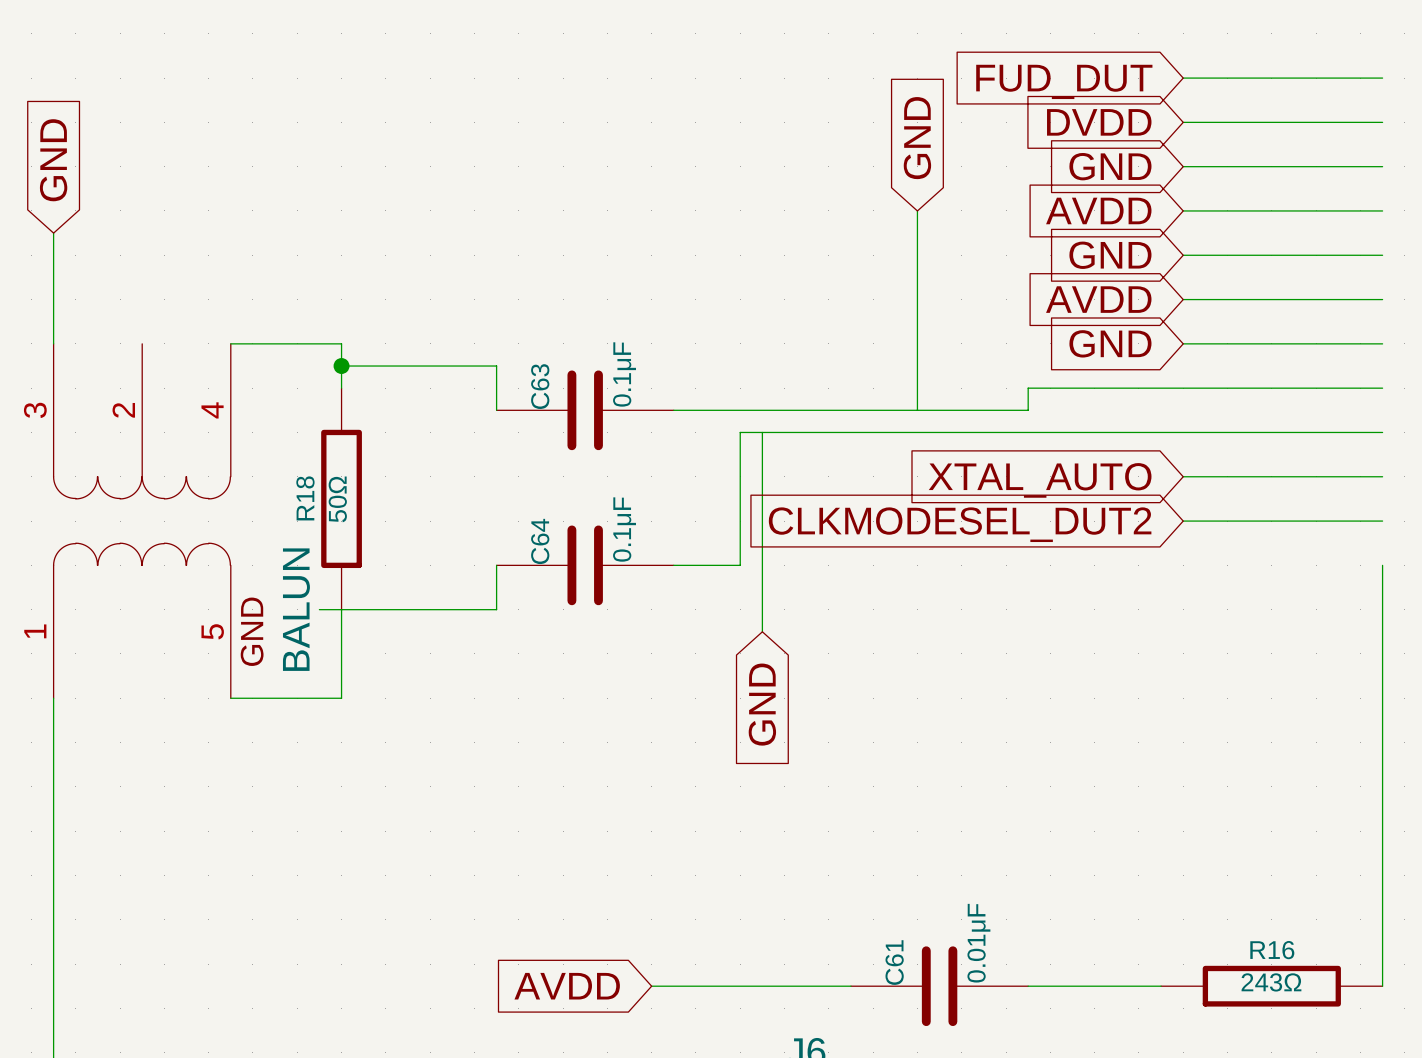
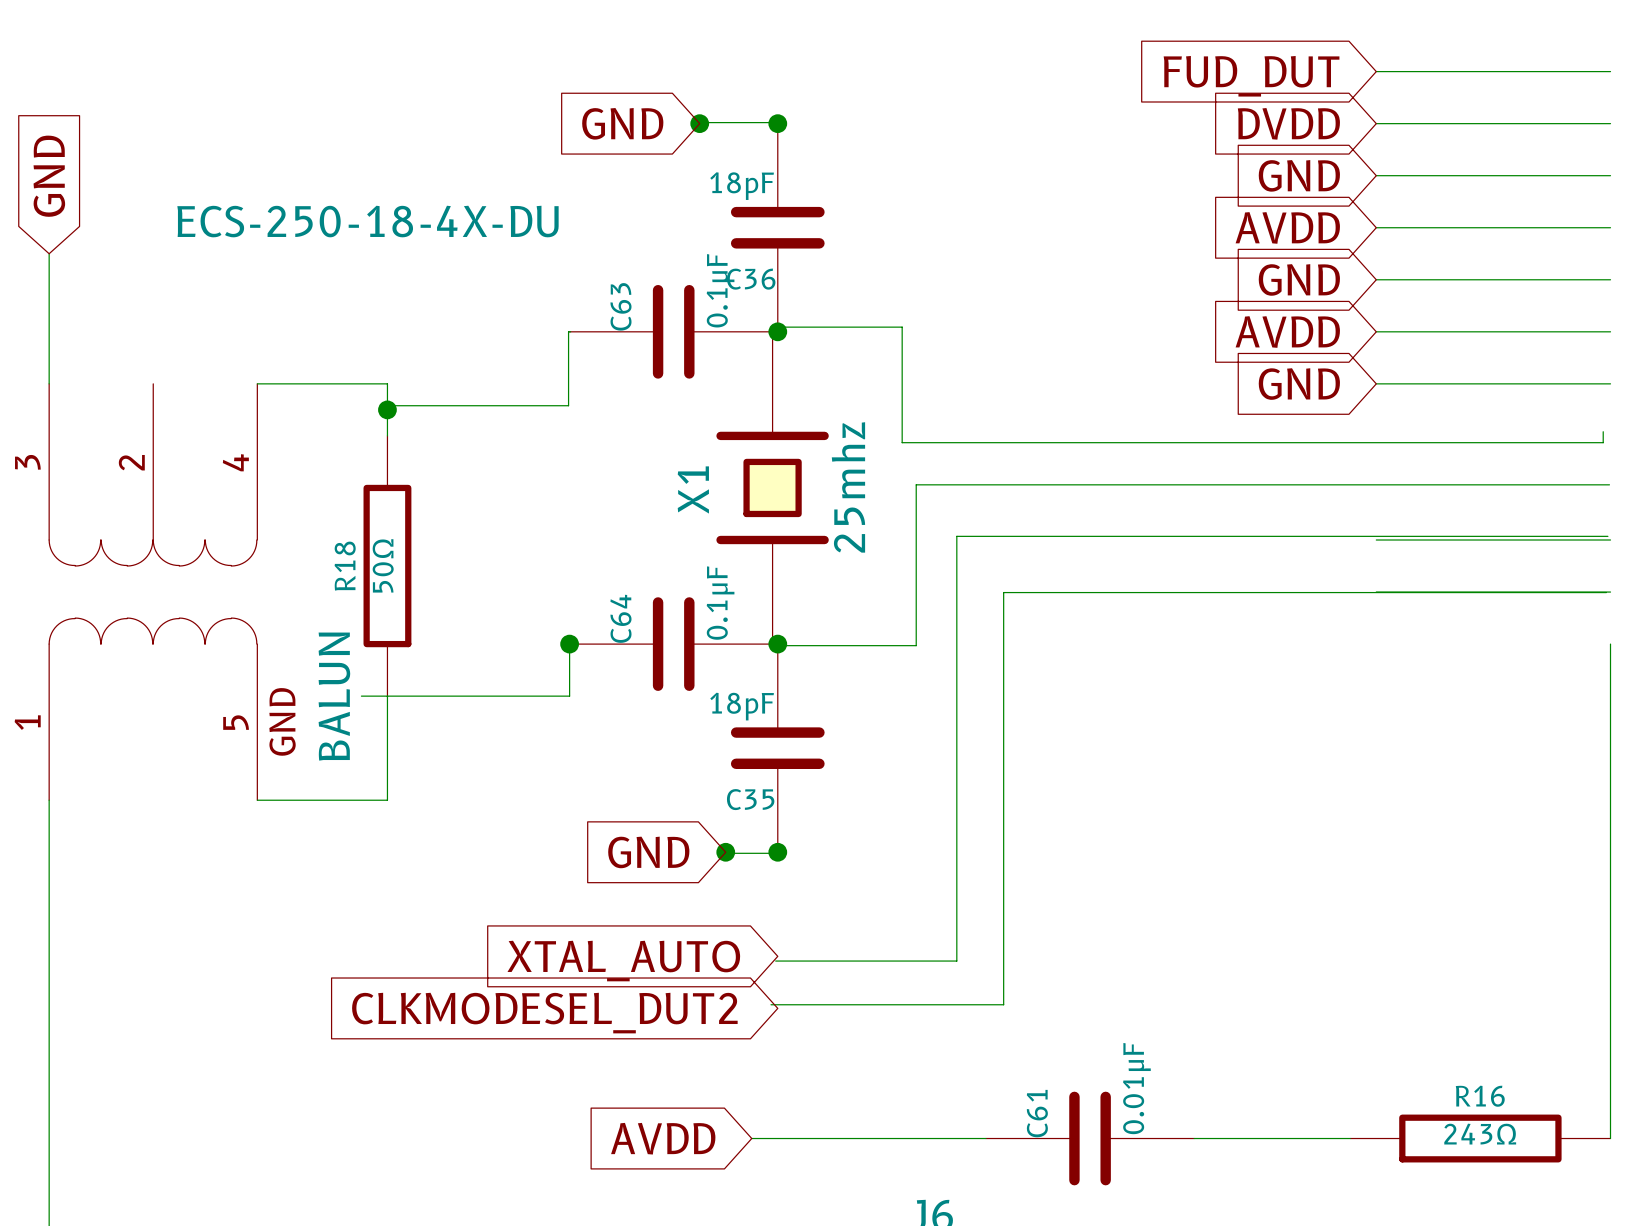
wire: none -> (772, 121) (772, 122) (694, 122)
global label: none -> GND (622, 123)
junction: none -> (699, 123)
junction: none -> (777, 123)
global label: GND (917, 138) -> none
C36: none -> 18pF (777, 227)
wire: (917, 210) (917, 410) -> none
wire: none -> (771, 327) (902, 327) (902, 442) (1603, 442) (1603, 431)
wire: none -> (570, 331) (568, 331) (568, 405) (380, 405)
junction: none -> (777, 331)
wire: (341, 366) (496, 366) (496, 410) -> none
wire: (1382, 388) (1028, 388) (1028, 410) (673, 410) -> none
C63 position: (585, 410) -> (673, 331)
wire: none -> (1609, 484) (916, 484) (916, 645) (775, 645)
X1: none -> 25mhz (772, 487)
wire: (762, 432) (762, 631) -> none
wire: (1382, 432) (740, 432) (740, 565) (673, 565) -> none
wire: none -> (1607, 536) (956, 536) (956, 961) (775, 961)
global label: XTAL_AUTO (1040, 480) -> none
wire: none -> (1606, 592) (1003, 592) (1003, 1004) (771, 1004)
global label: CLKMODESEL_DUT2 (960, 524) -> none
junction: none -> (569, 644)
junction: none -> (777, 644)
C35: none -> 18pF (777, 748)
global label rotation: 0° (762, 704) -> 90° clockwise (648, 852)
global label position: GND (762, 704) -> GND (648, 852)
junction: none -> (725, 852)
wire: none -> (775, 851) (775, 853) (722, 853)
junction: none -> (777, 852)
global label: none -> XTAL_AUTO (623, 961)
global label: none -> CLKMODESEL_DUT2 (544, 1013)

